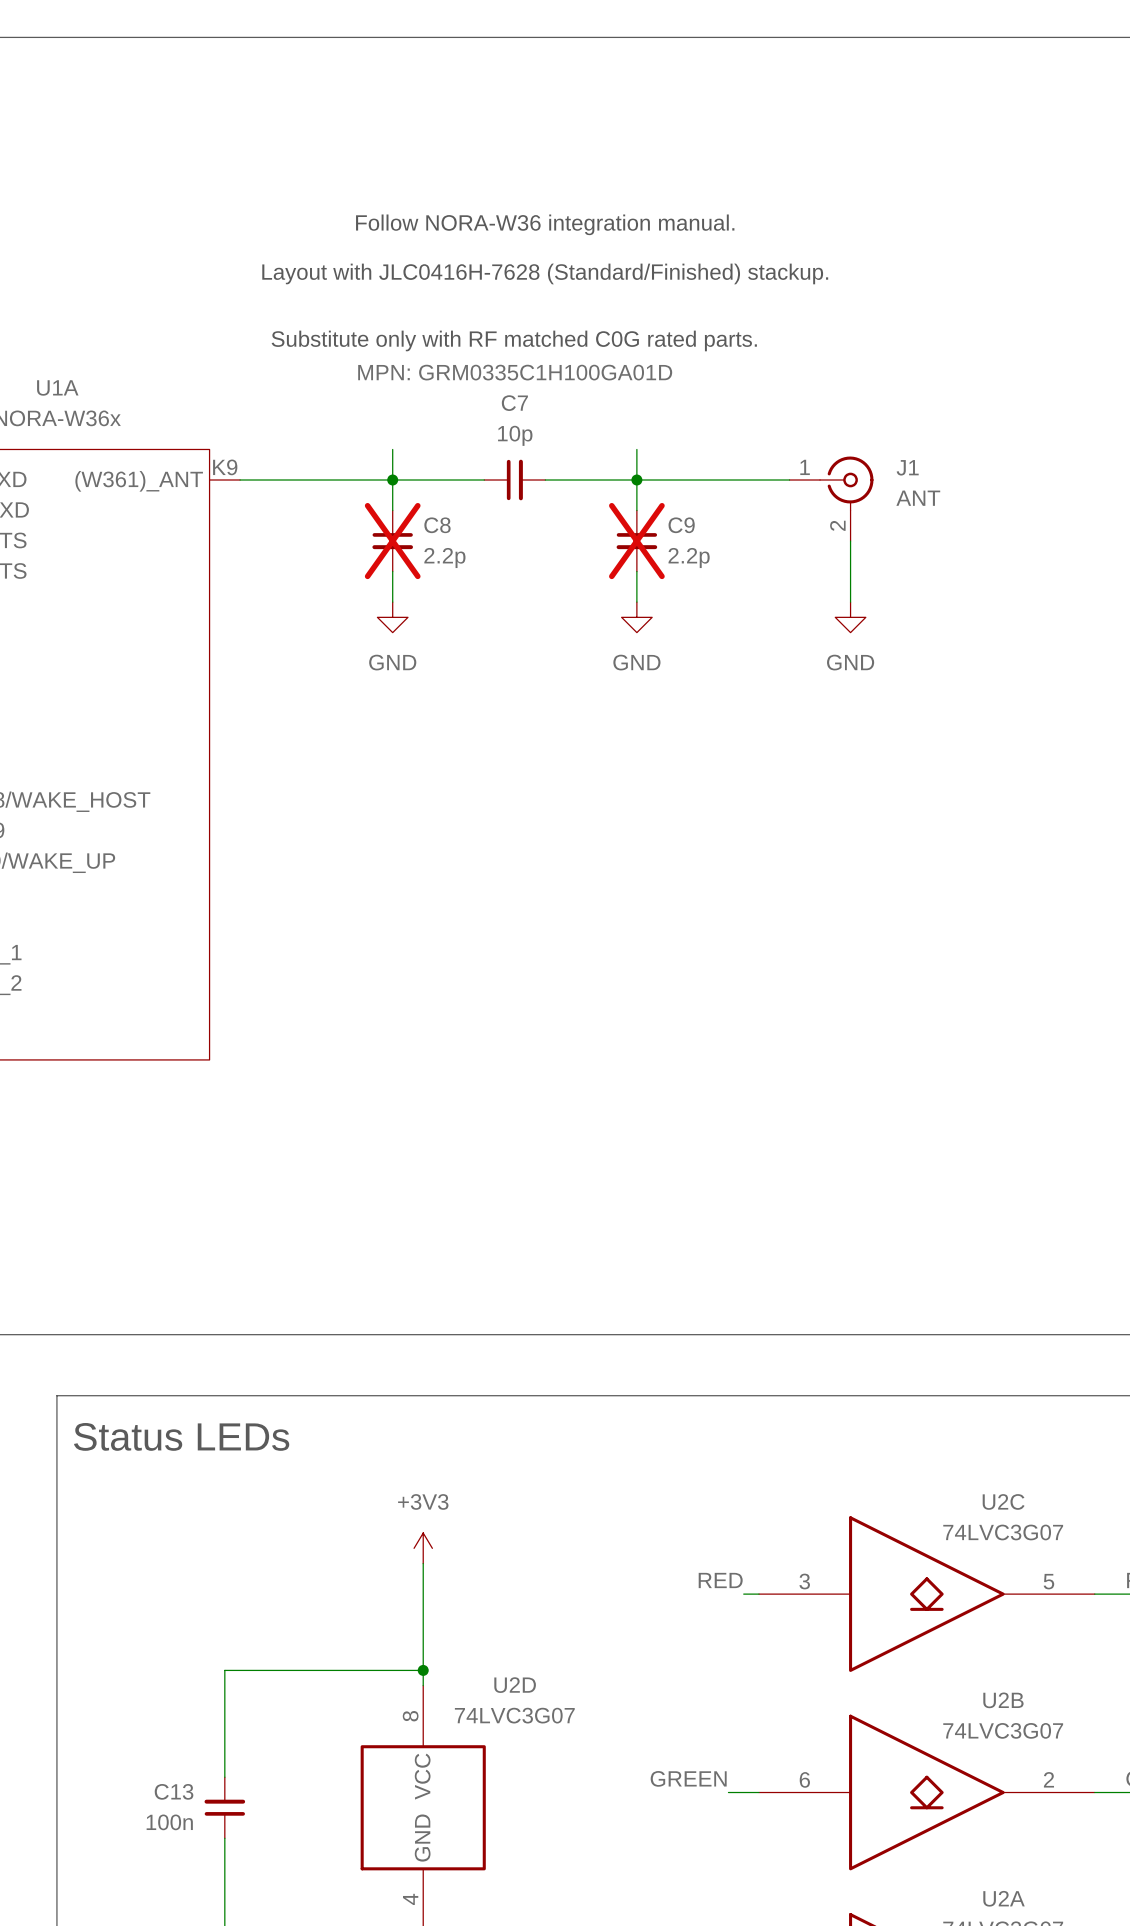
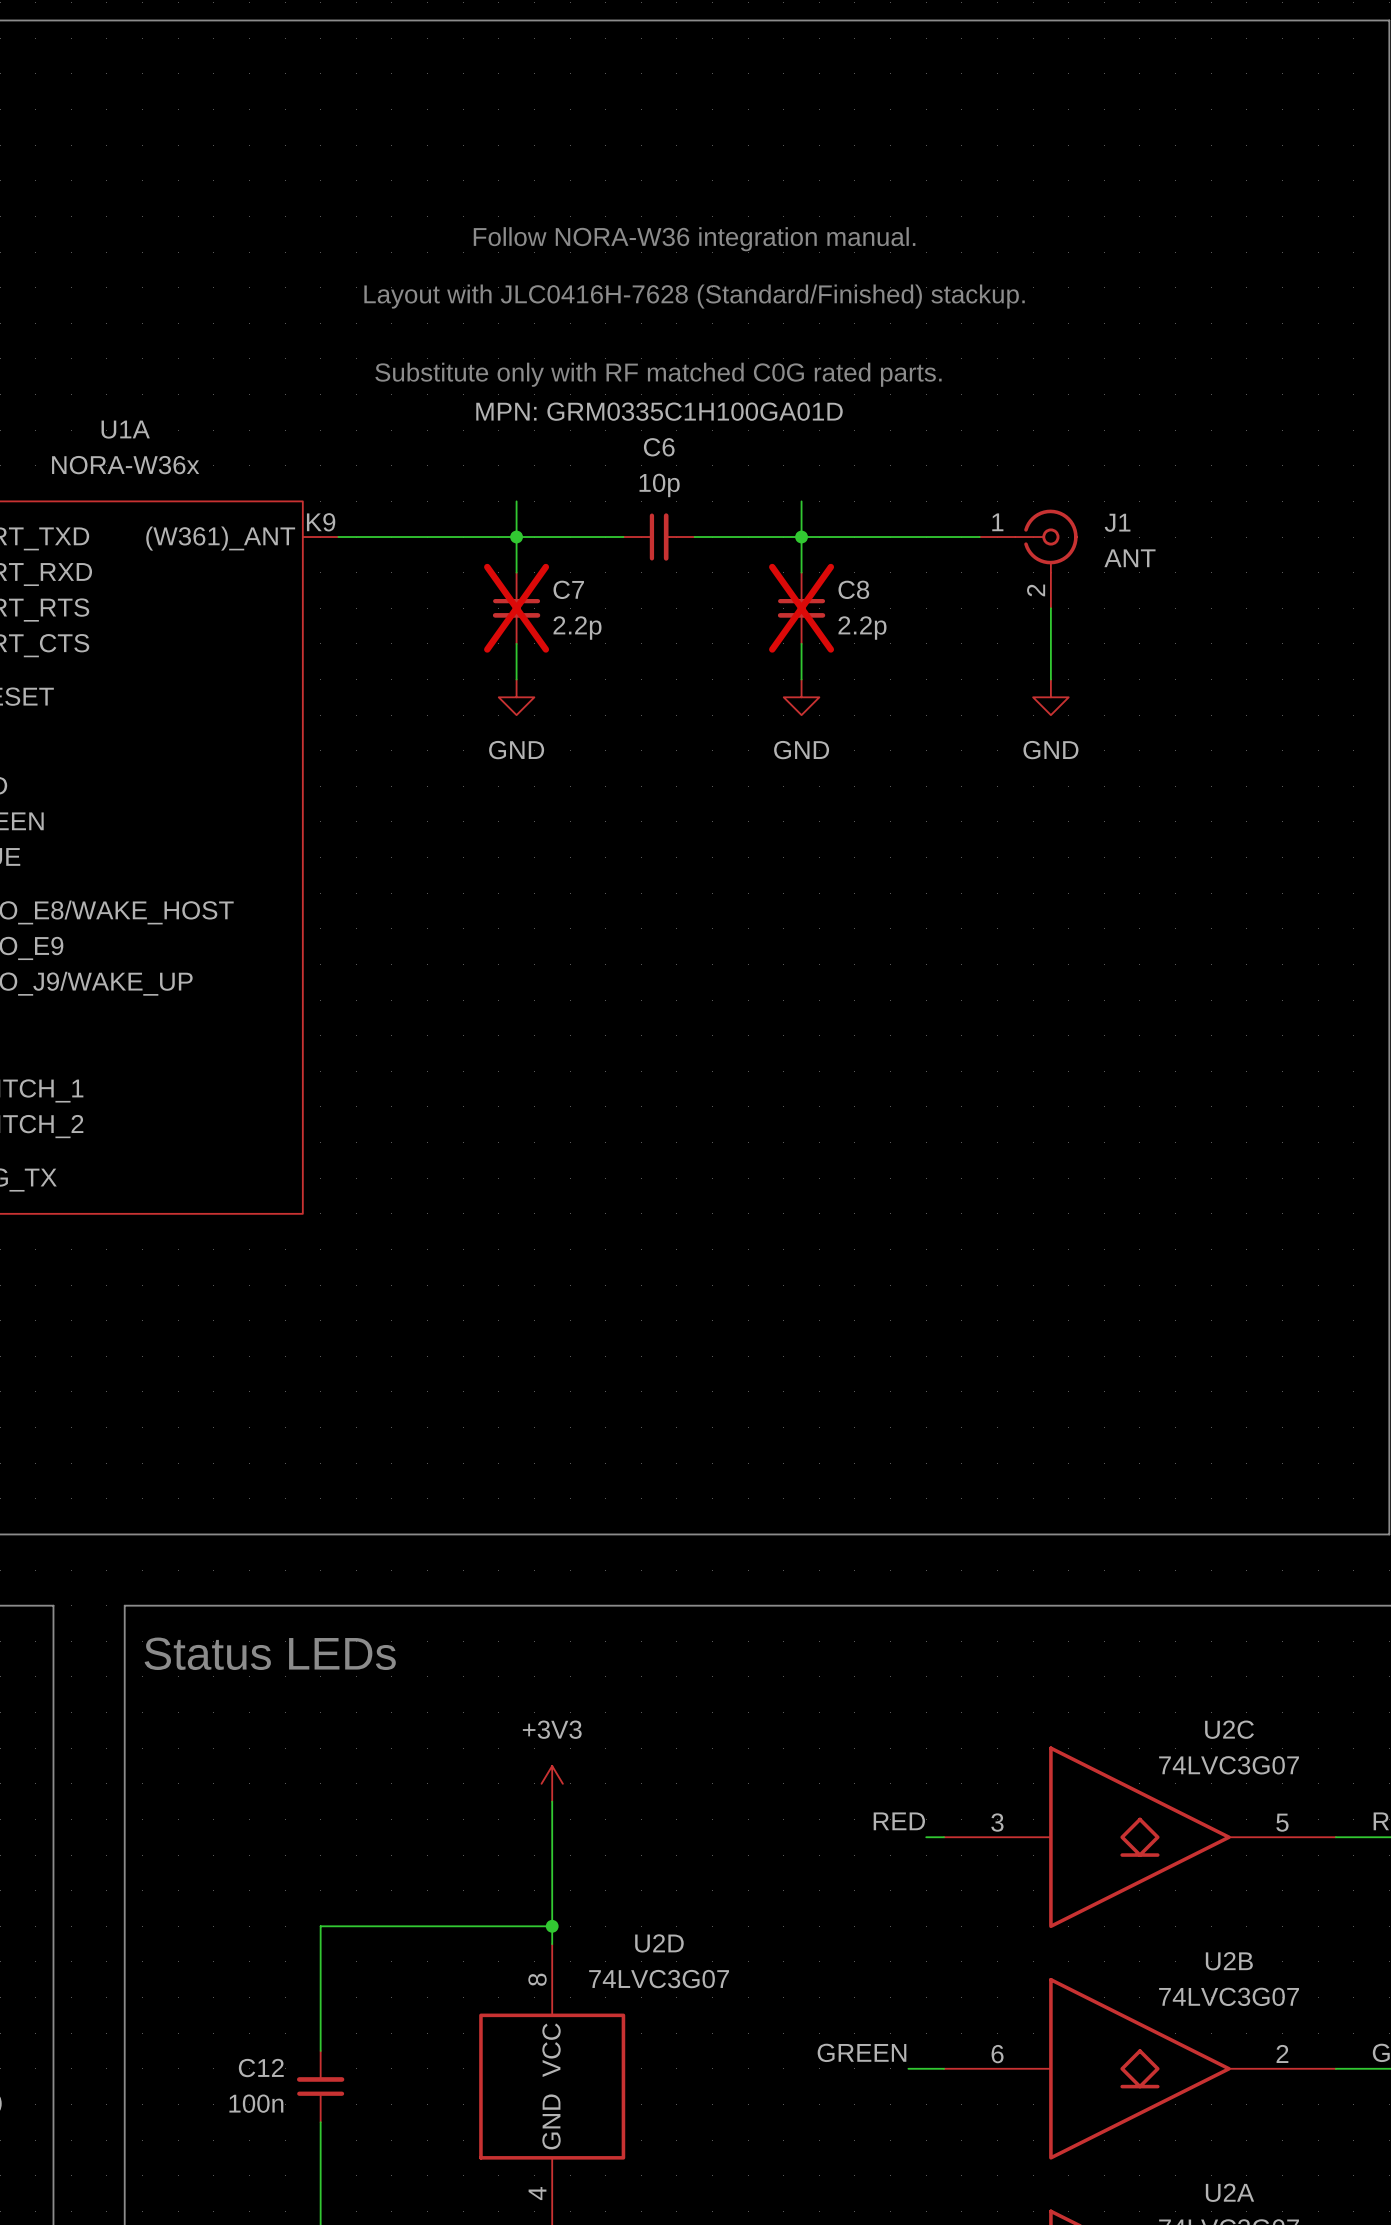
C7 name: C7 (514, 403) -> C6 (659, 447)
C8 name: C8 (437, 525) -> C7 (568, 589)
C9 name: C9 (681, 525) -> C8 (853, 589)
C13 name: C13 (174, 1791) -> C12 (261, 2068)

